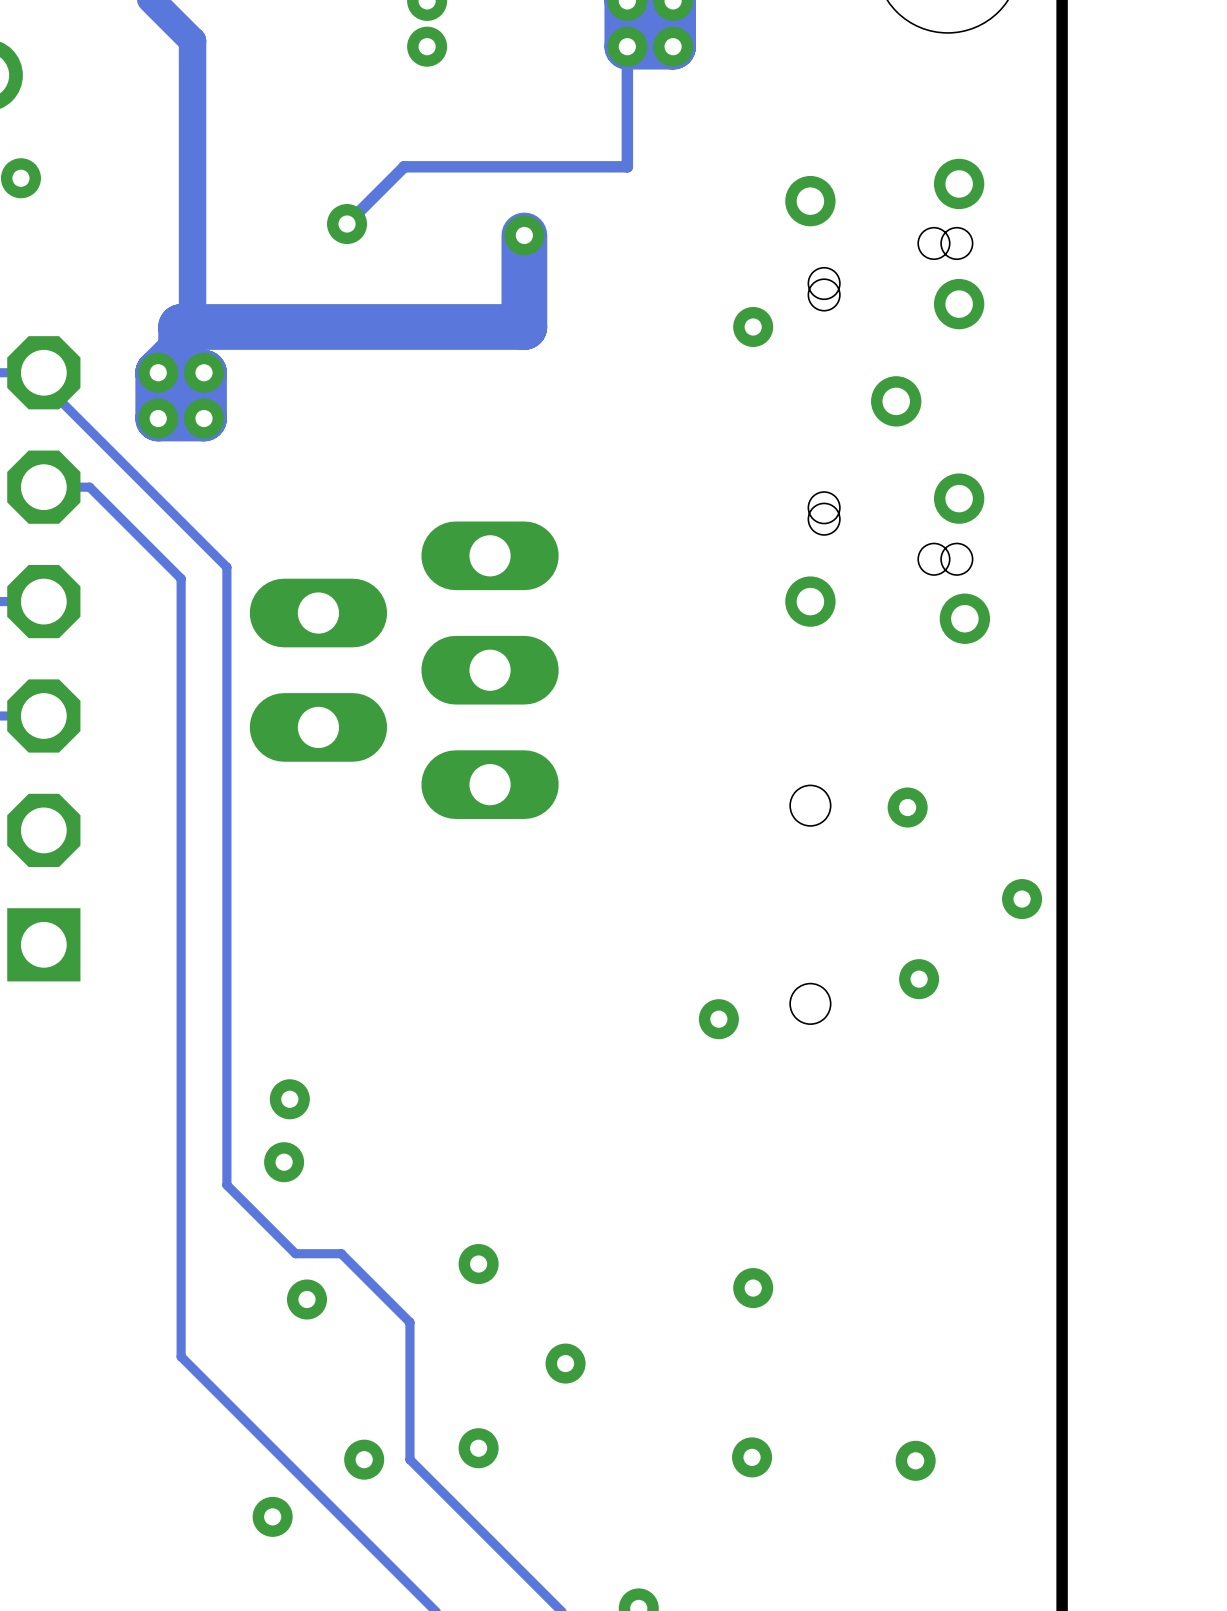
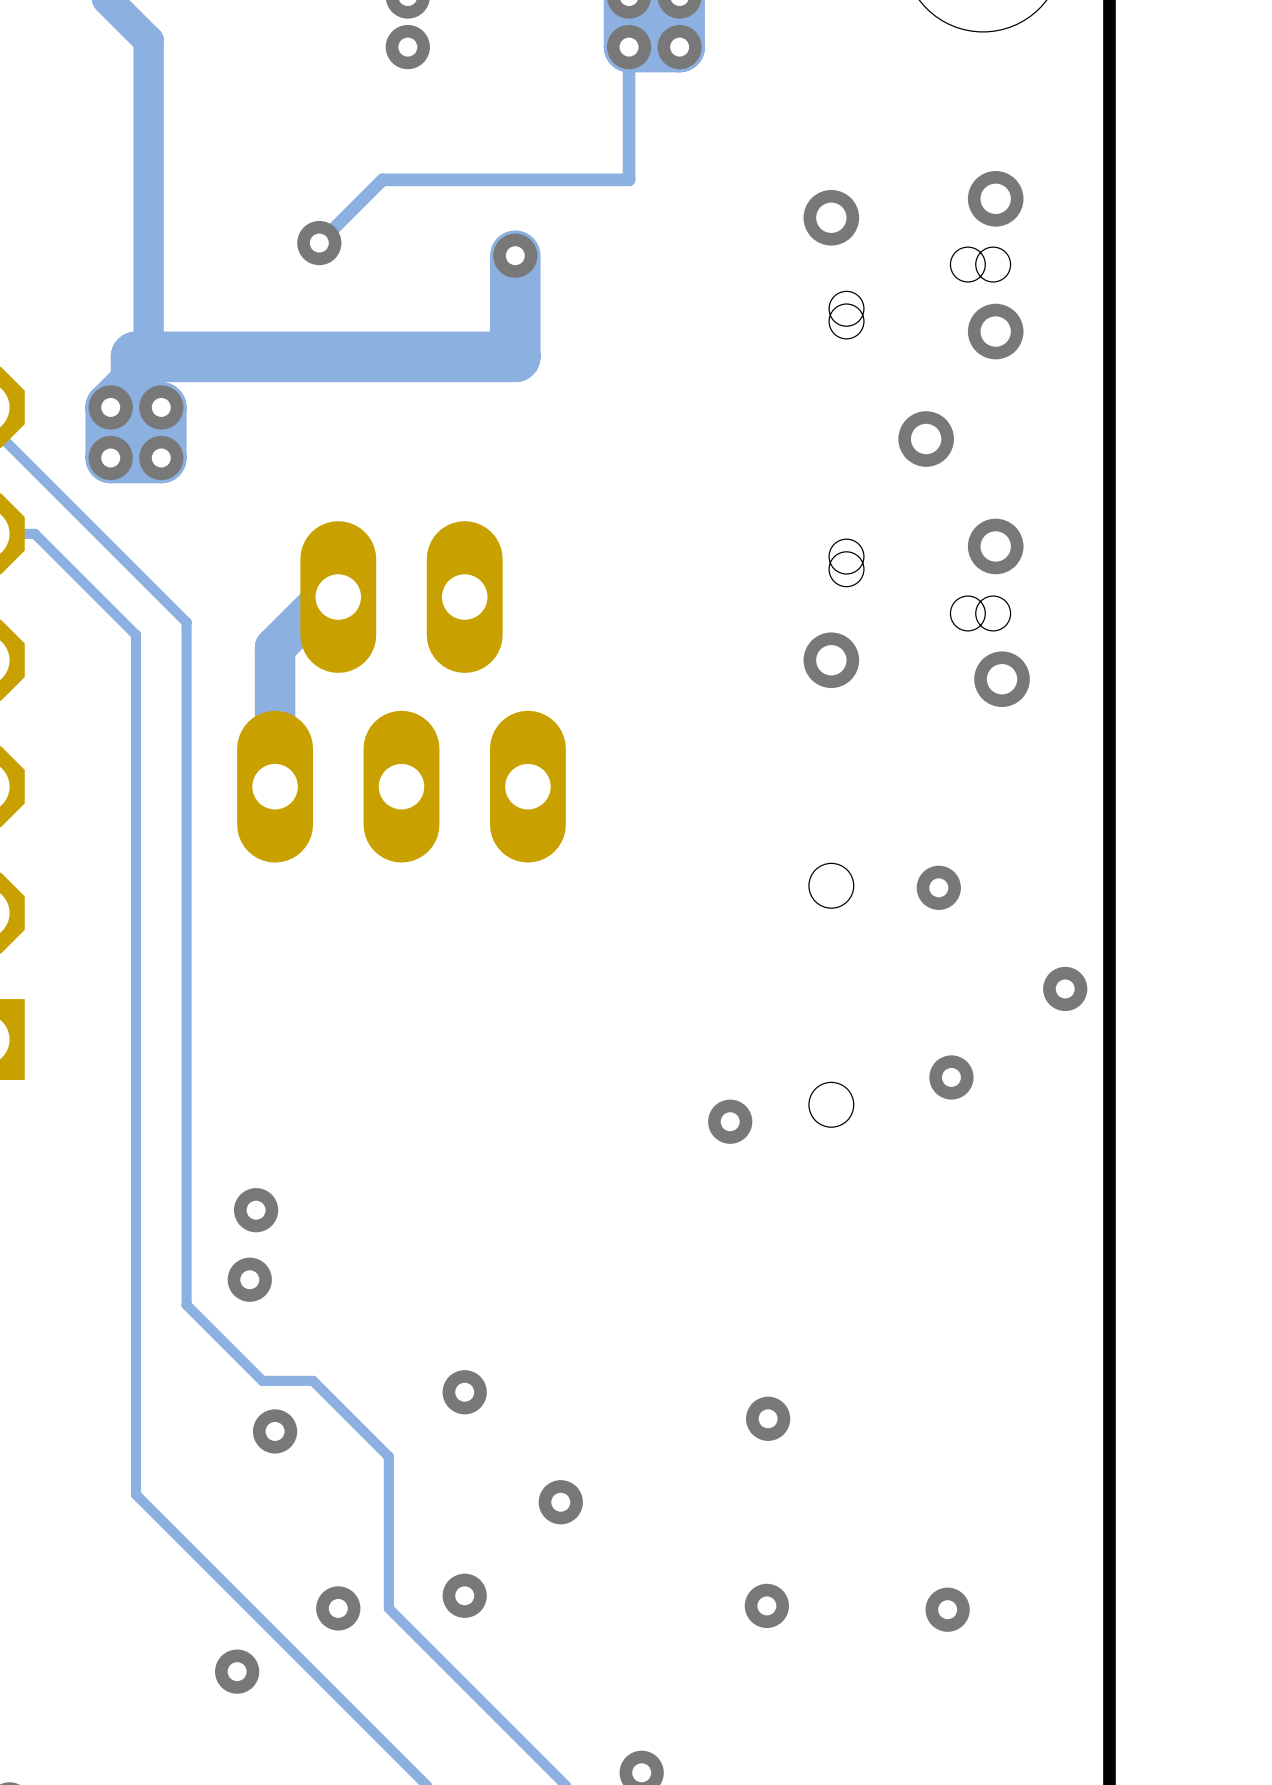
via: (753, 326) -> none
track: none -> (325, 597) (275, 647) (275, 786)
part rotation: 0° (318, 670) -> 90° clockwise (401, 597)
part position: (318, 670) -> (401, 597)
part rotation: 0° (490, 670) -> 90° clockwise (401, 786)

